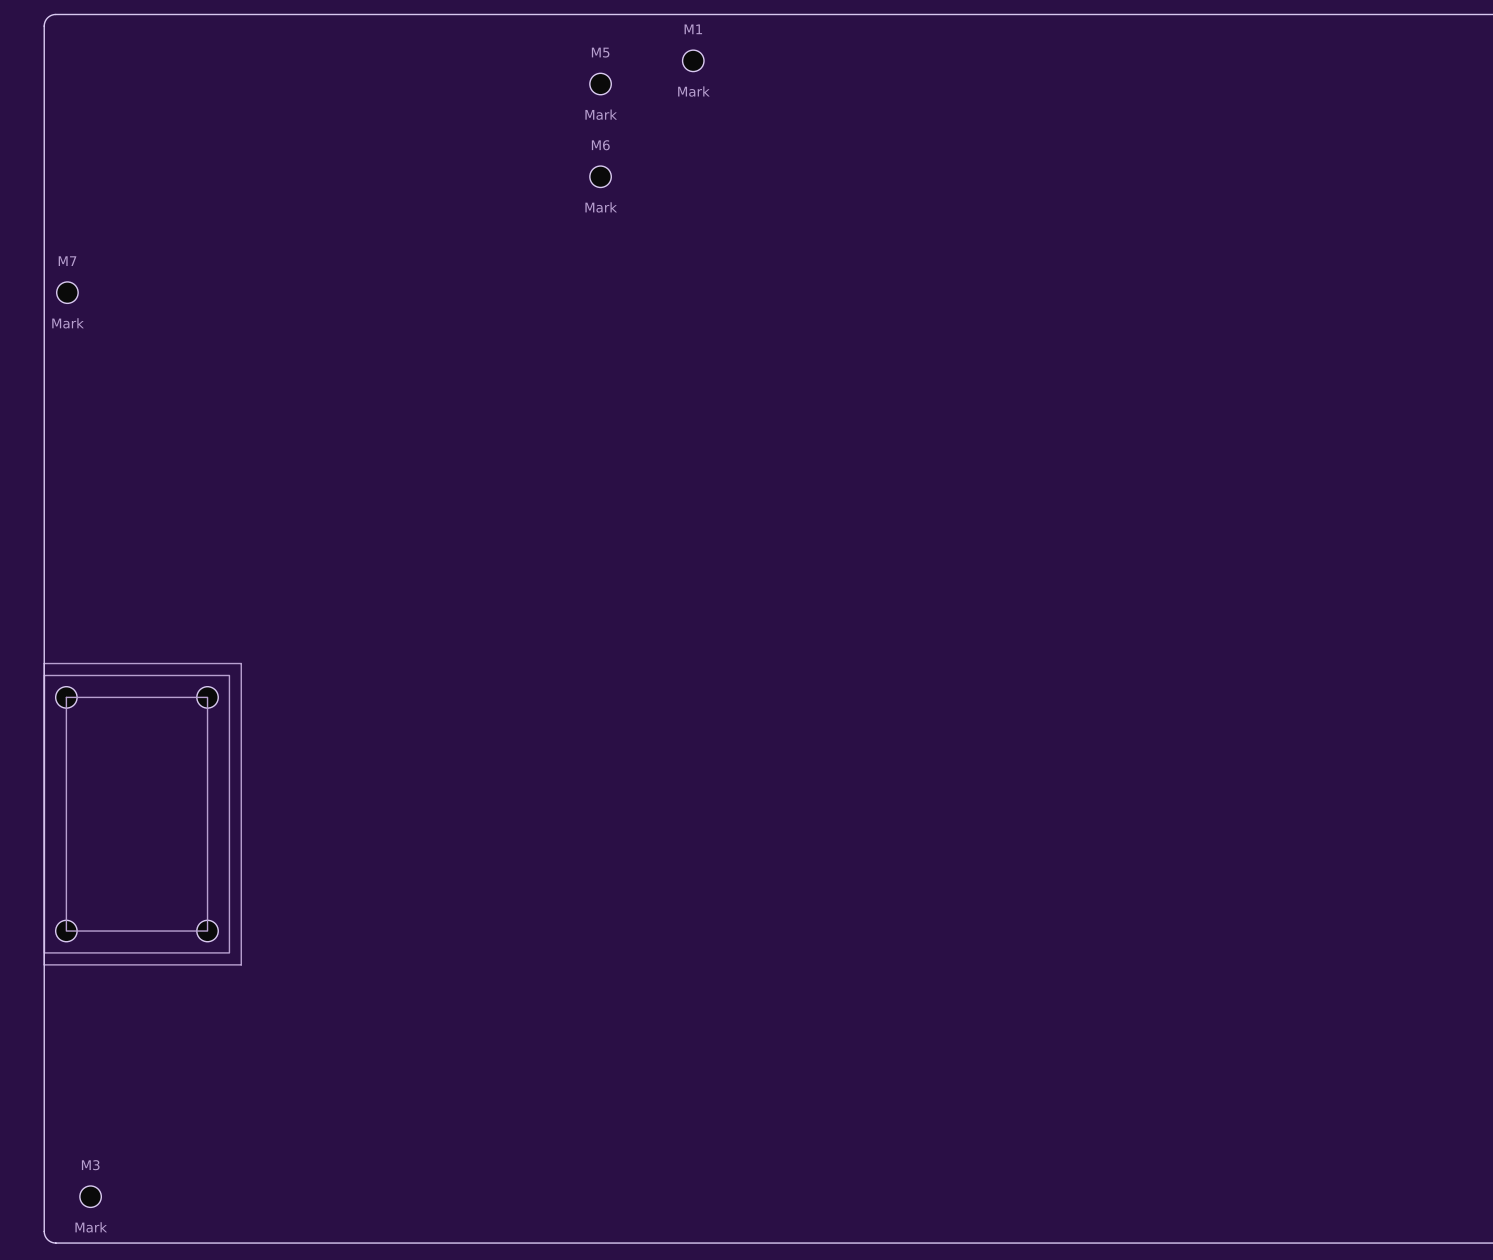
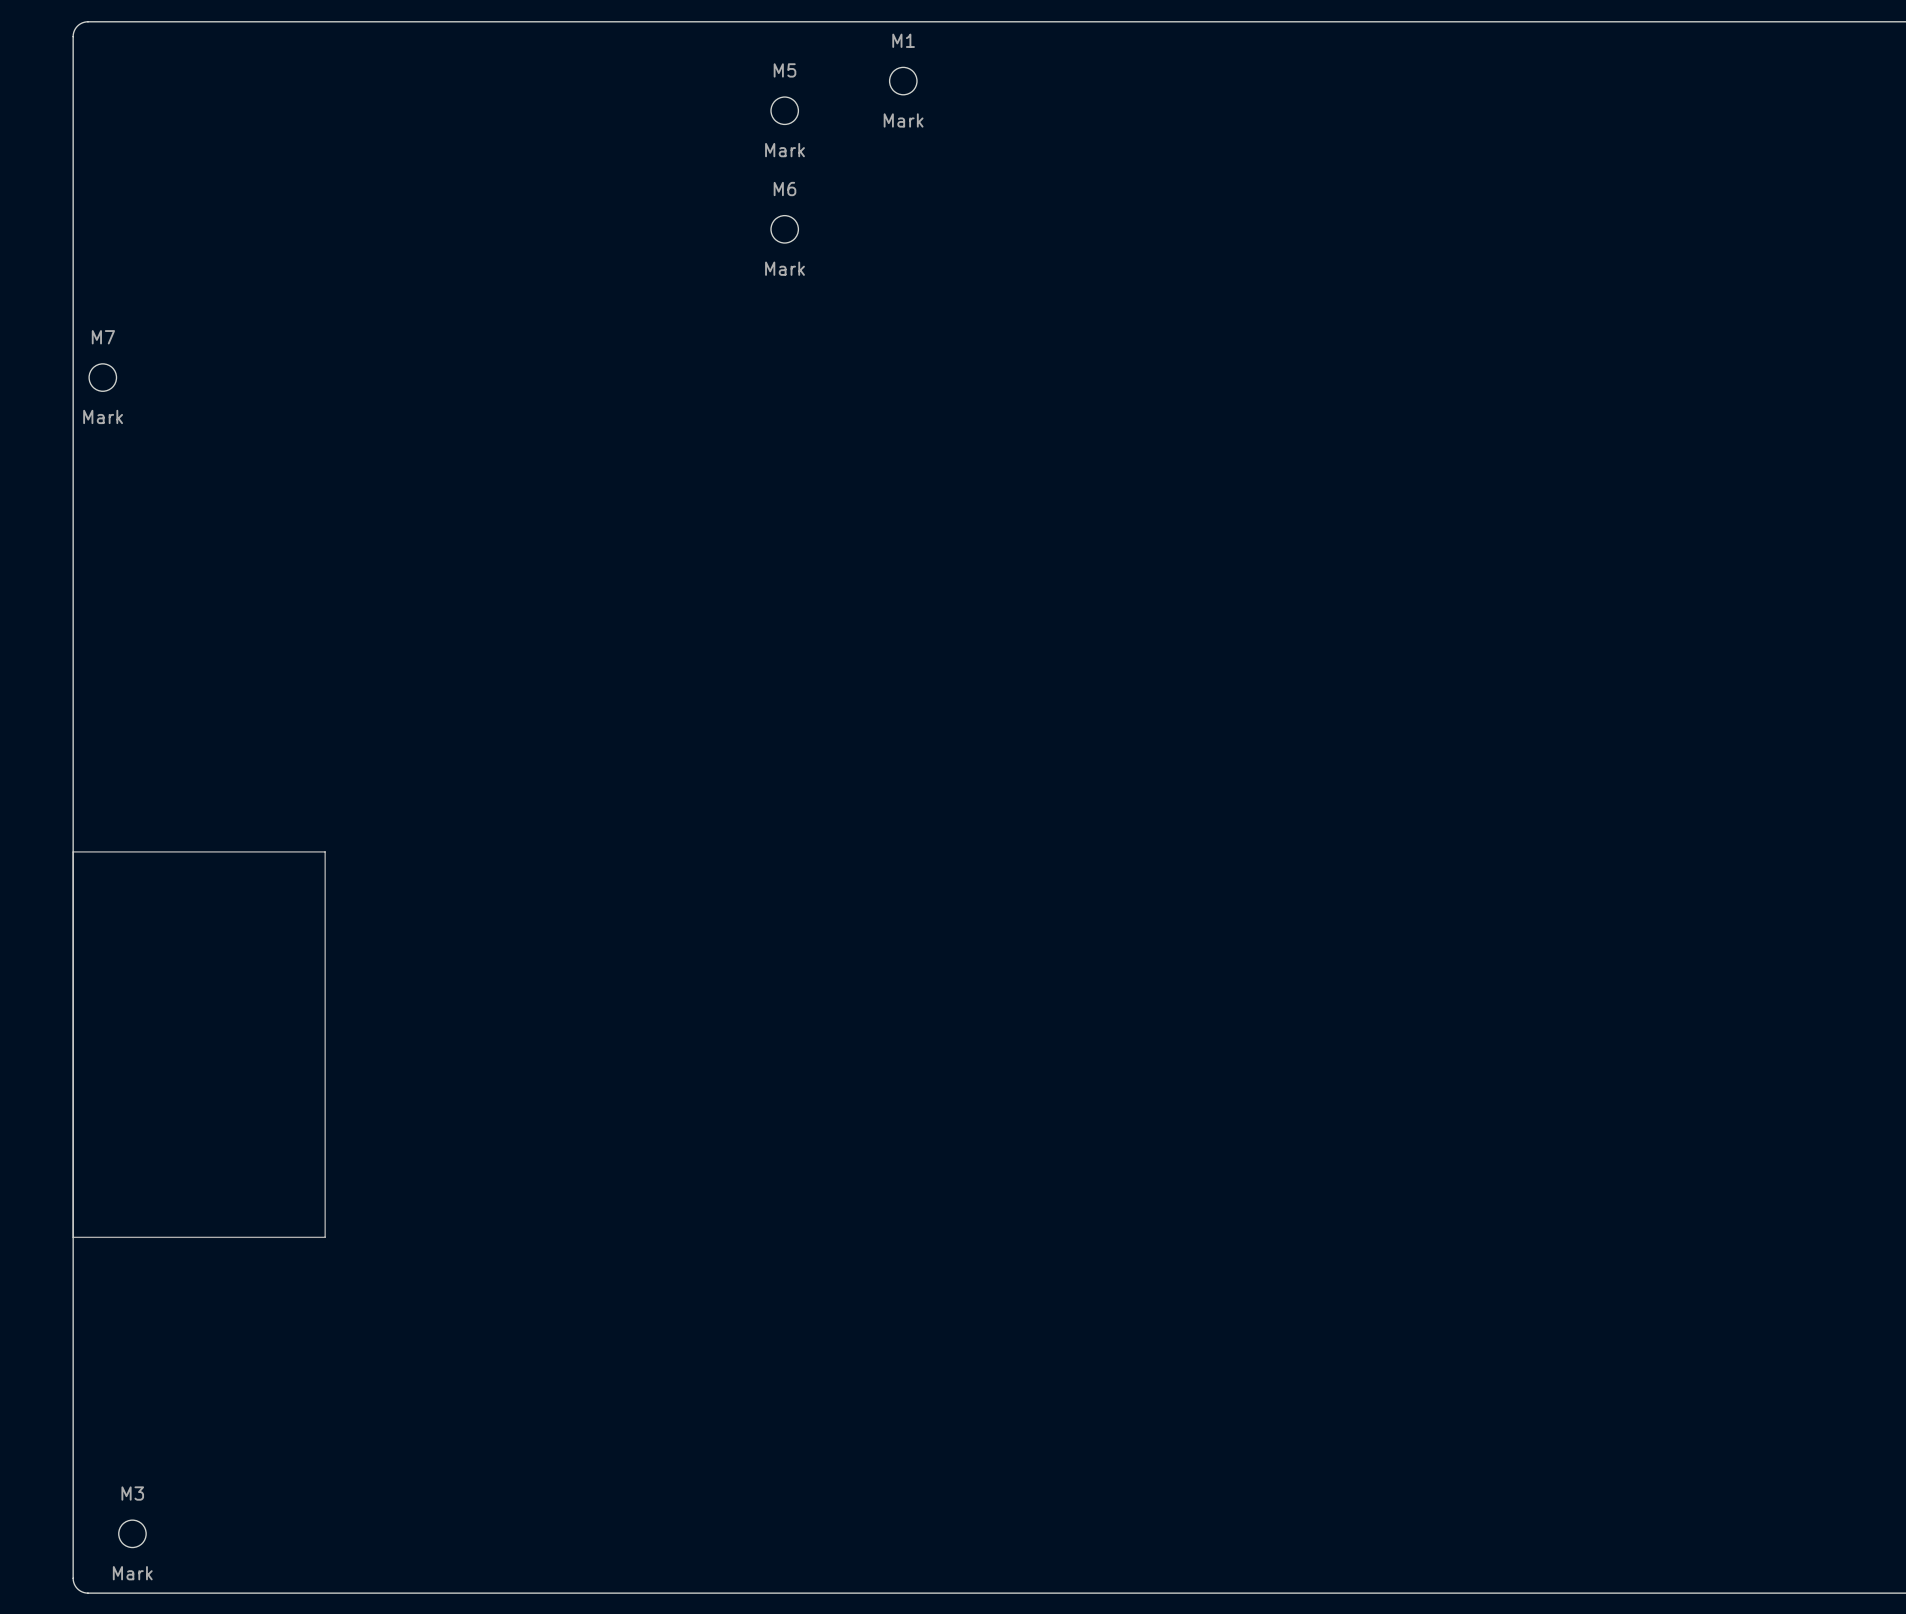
part: (136, 814) -> none

